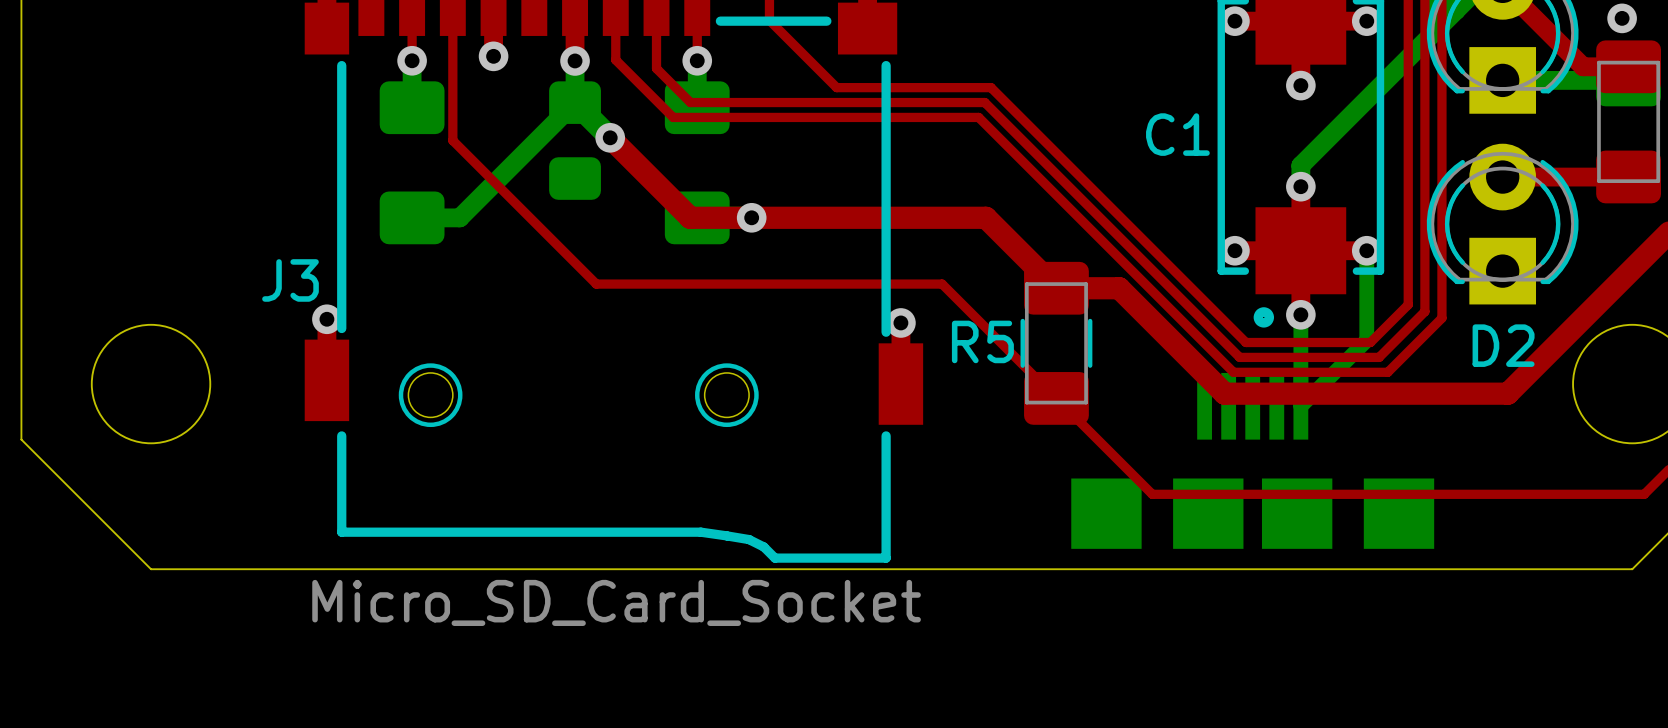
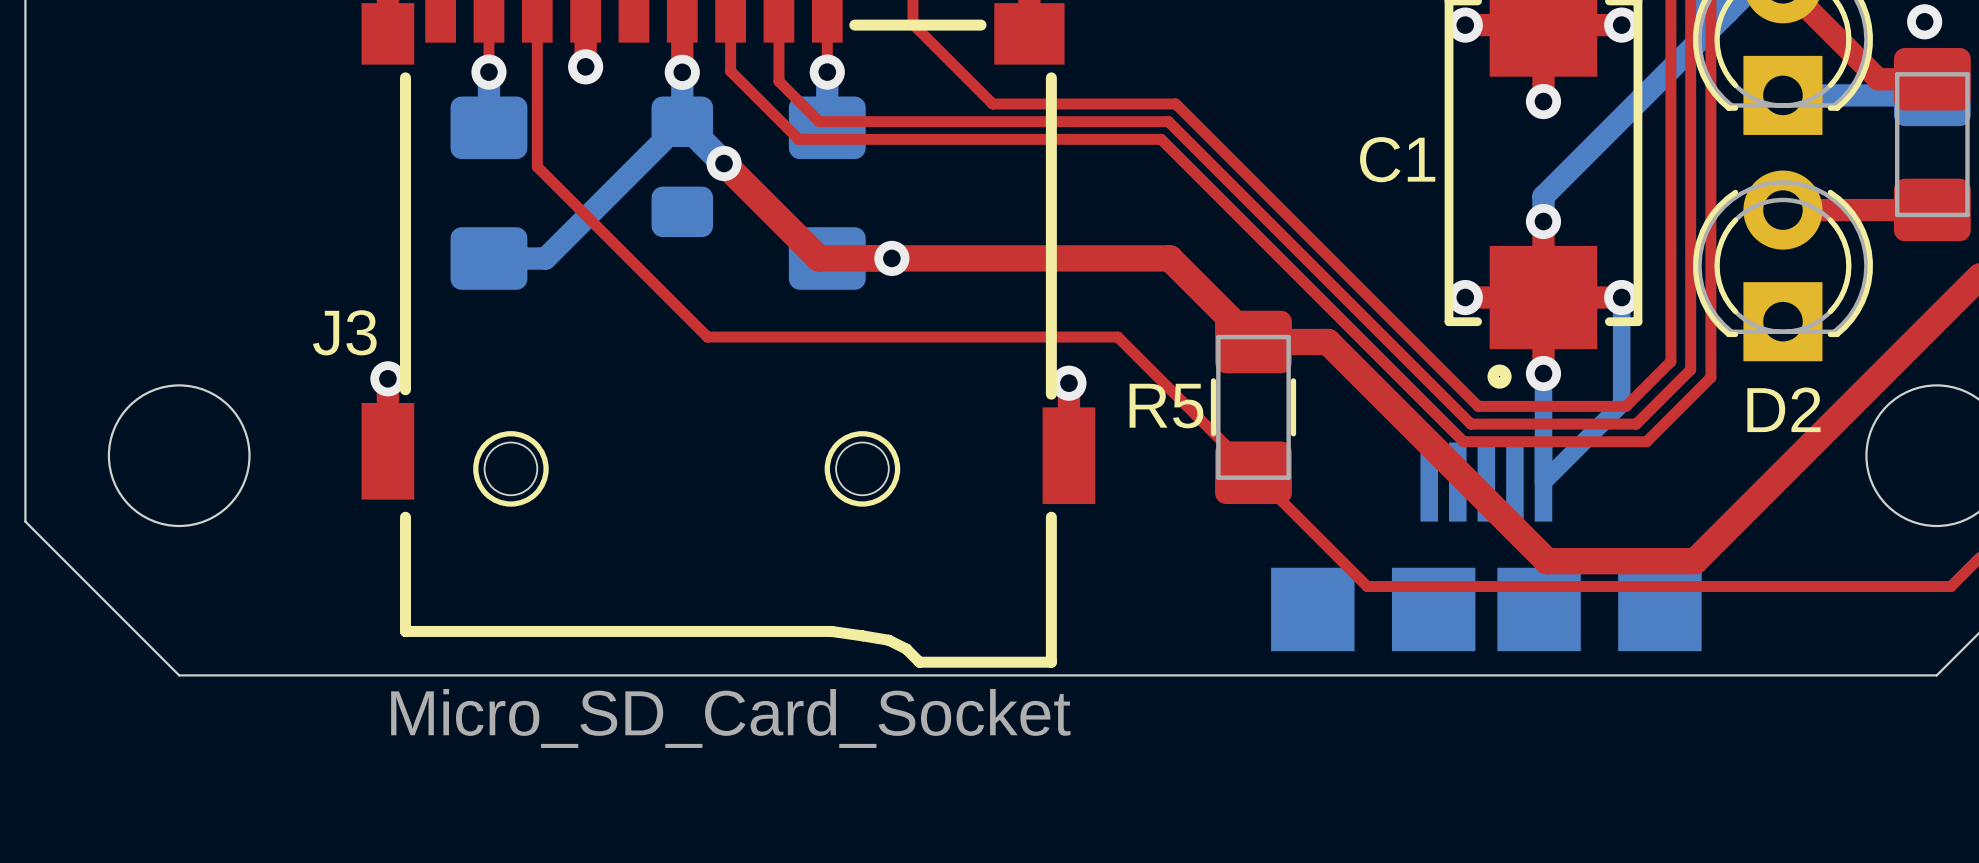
top track: (1224, 393) (1507, 393) -> (1453, 467) (1547, 561) (1695, 561) (1789, 467)

